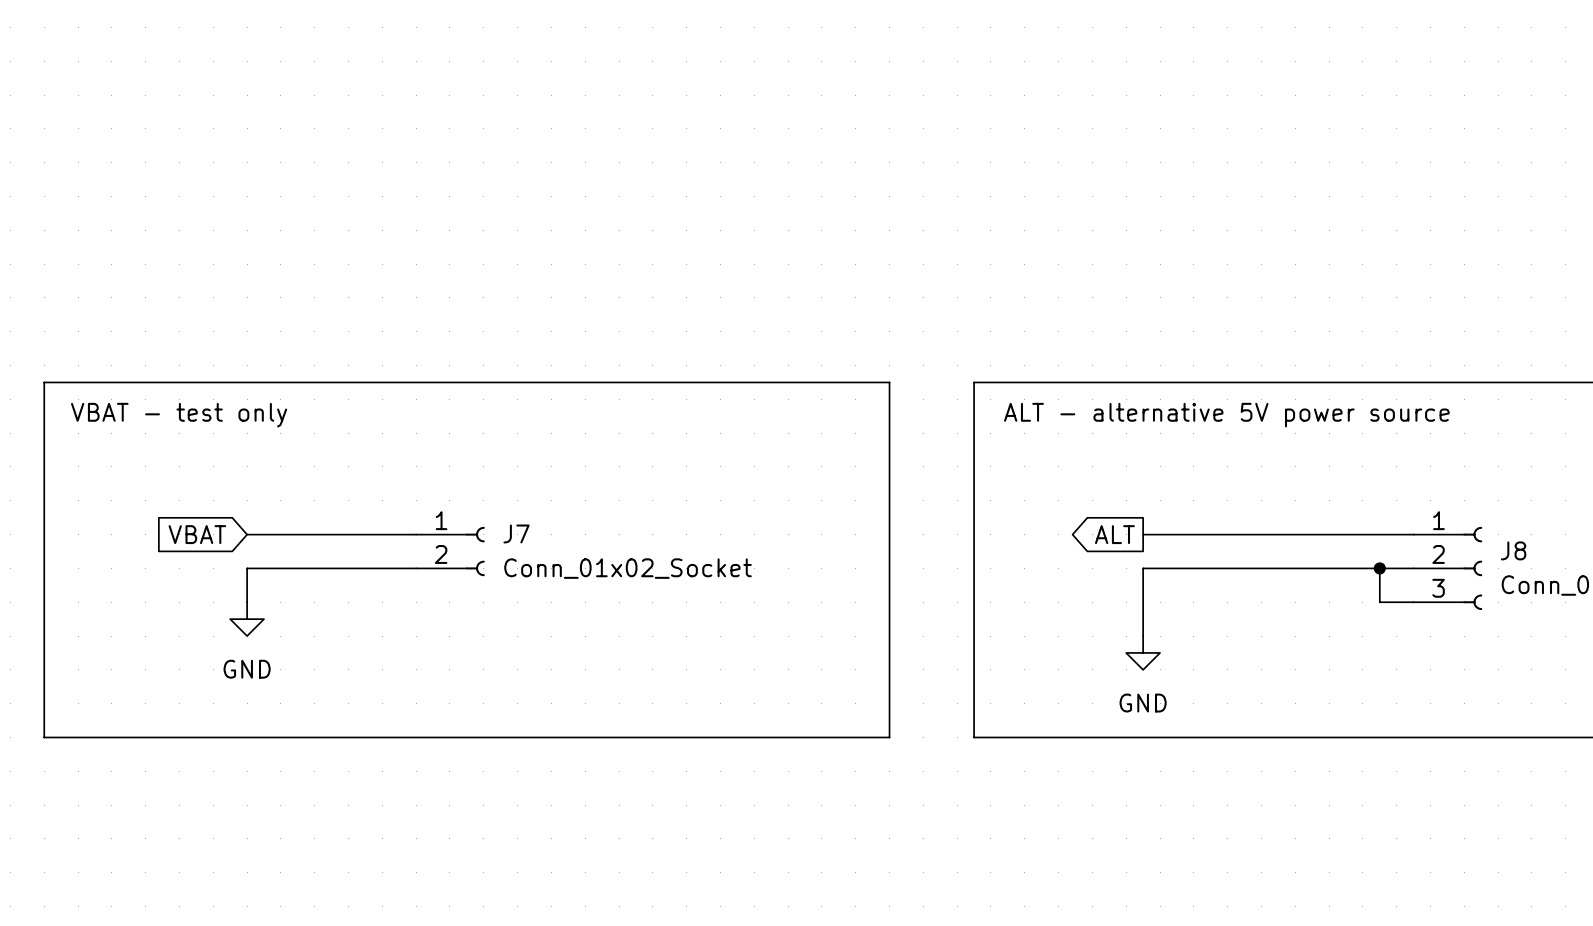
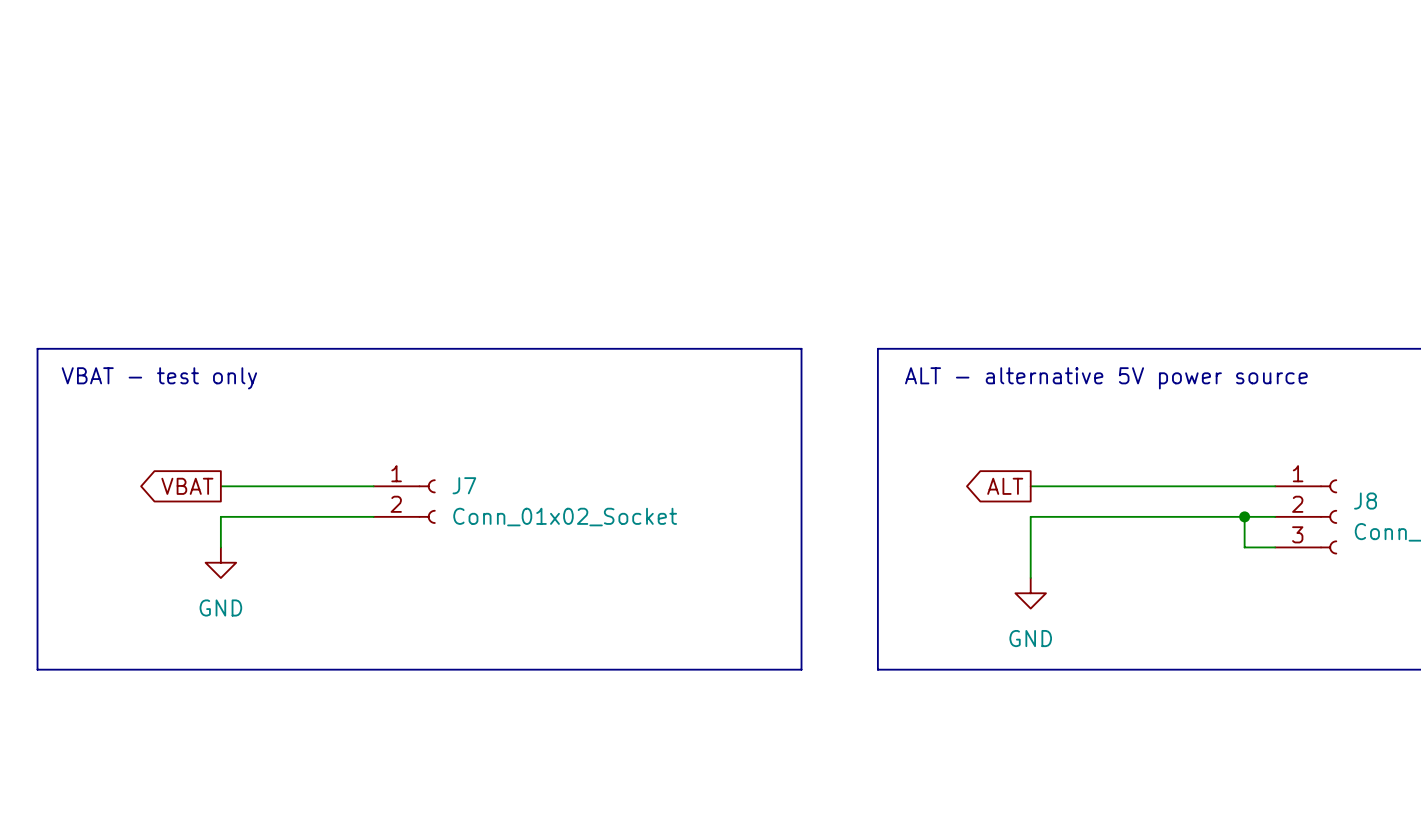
global label shape: input (197, 534) -> output (187, 486)

